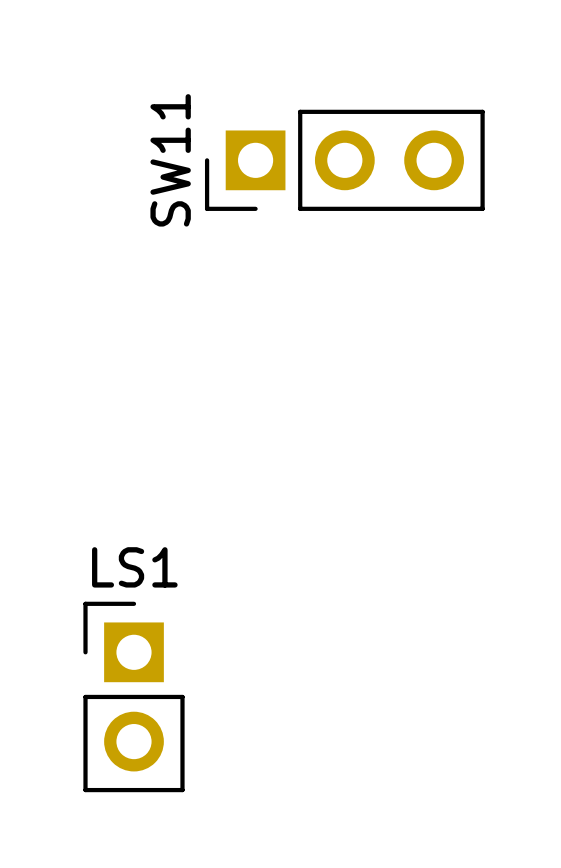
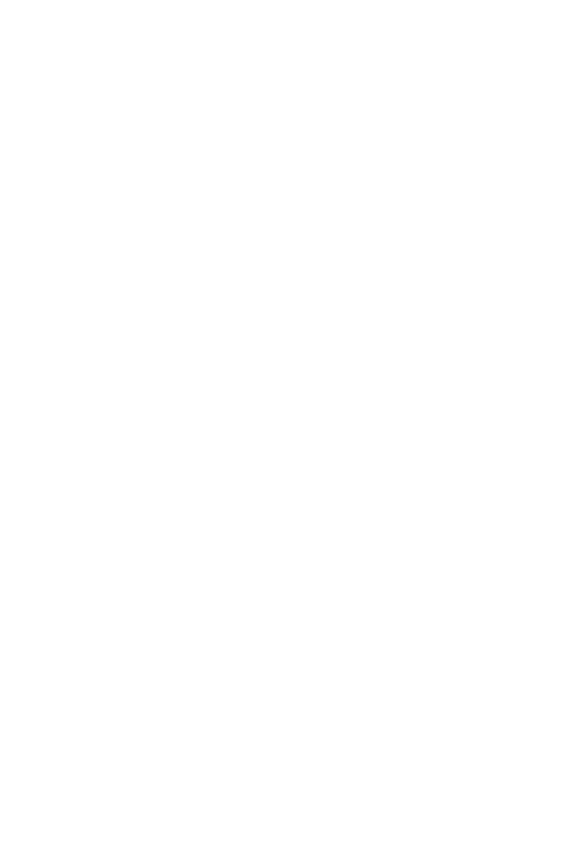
SW11: (344, 160) -> none
LS1: (133, 696) -> none

